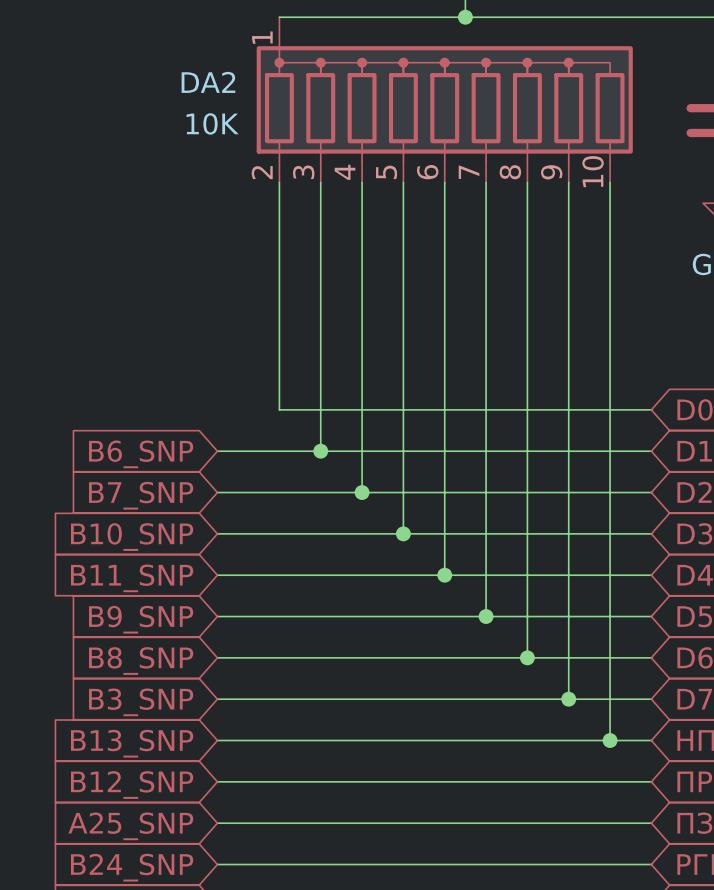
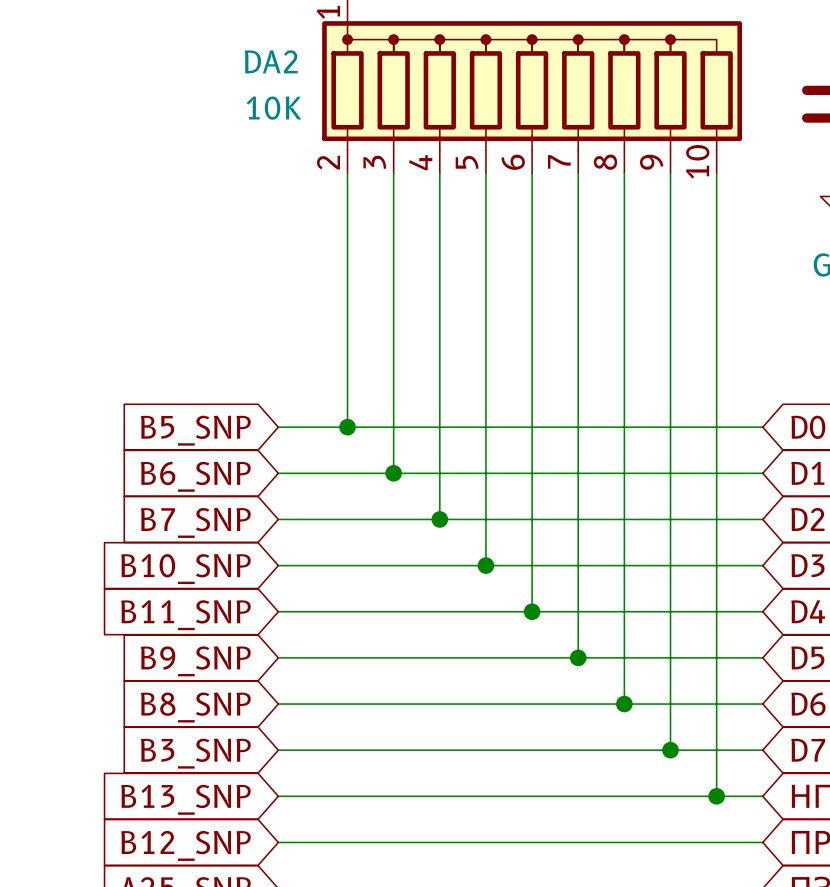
wire: none -> (278, 427) (347, 427)
junction: none -> (347, 427)
global label: none -> B5_SNP (195, 430)

